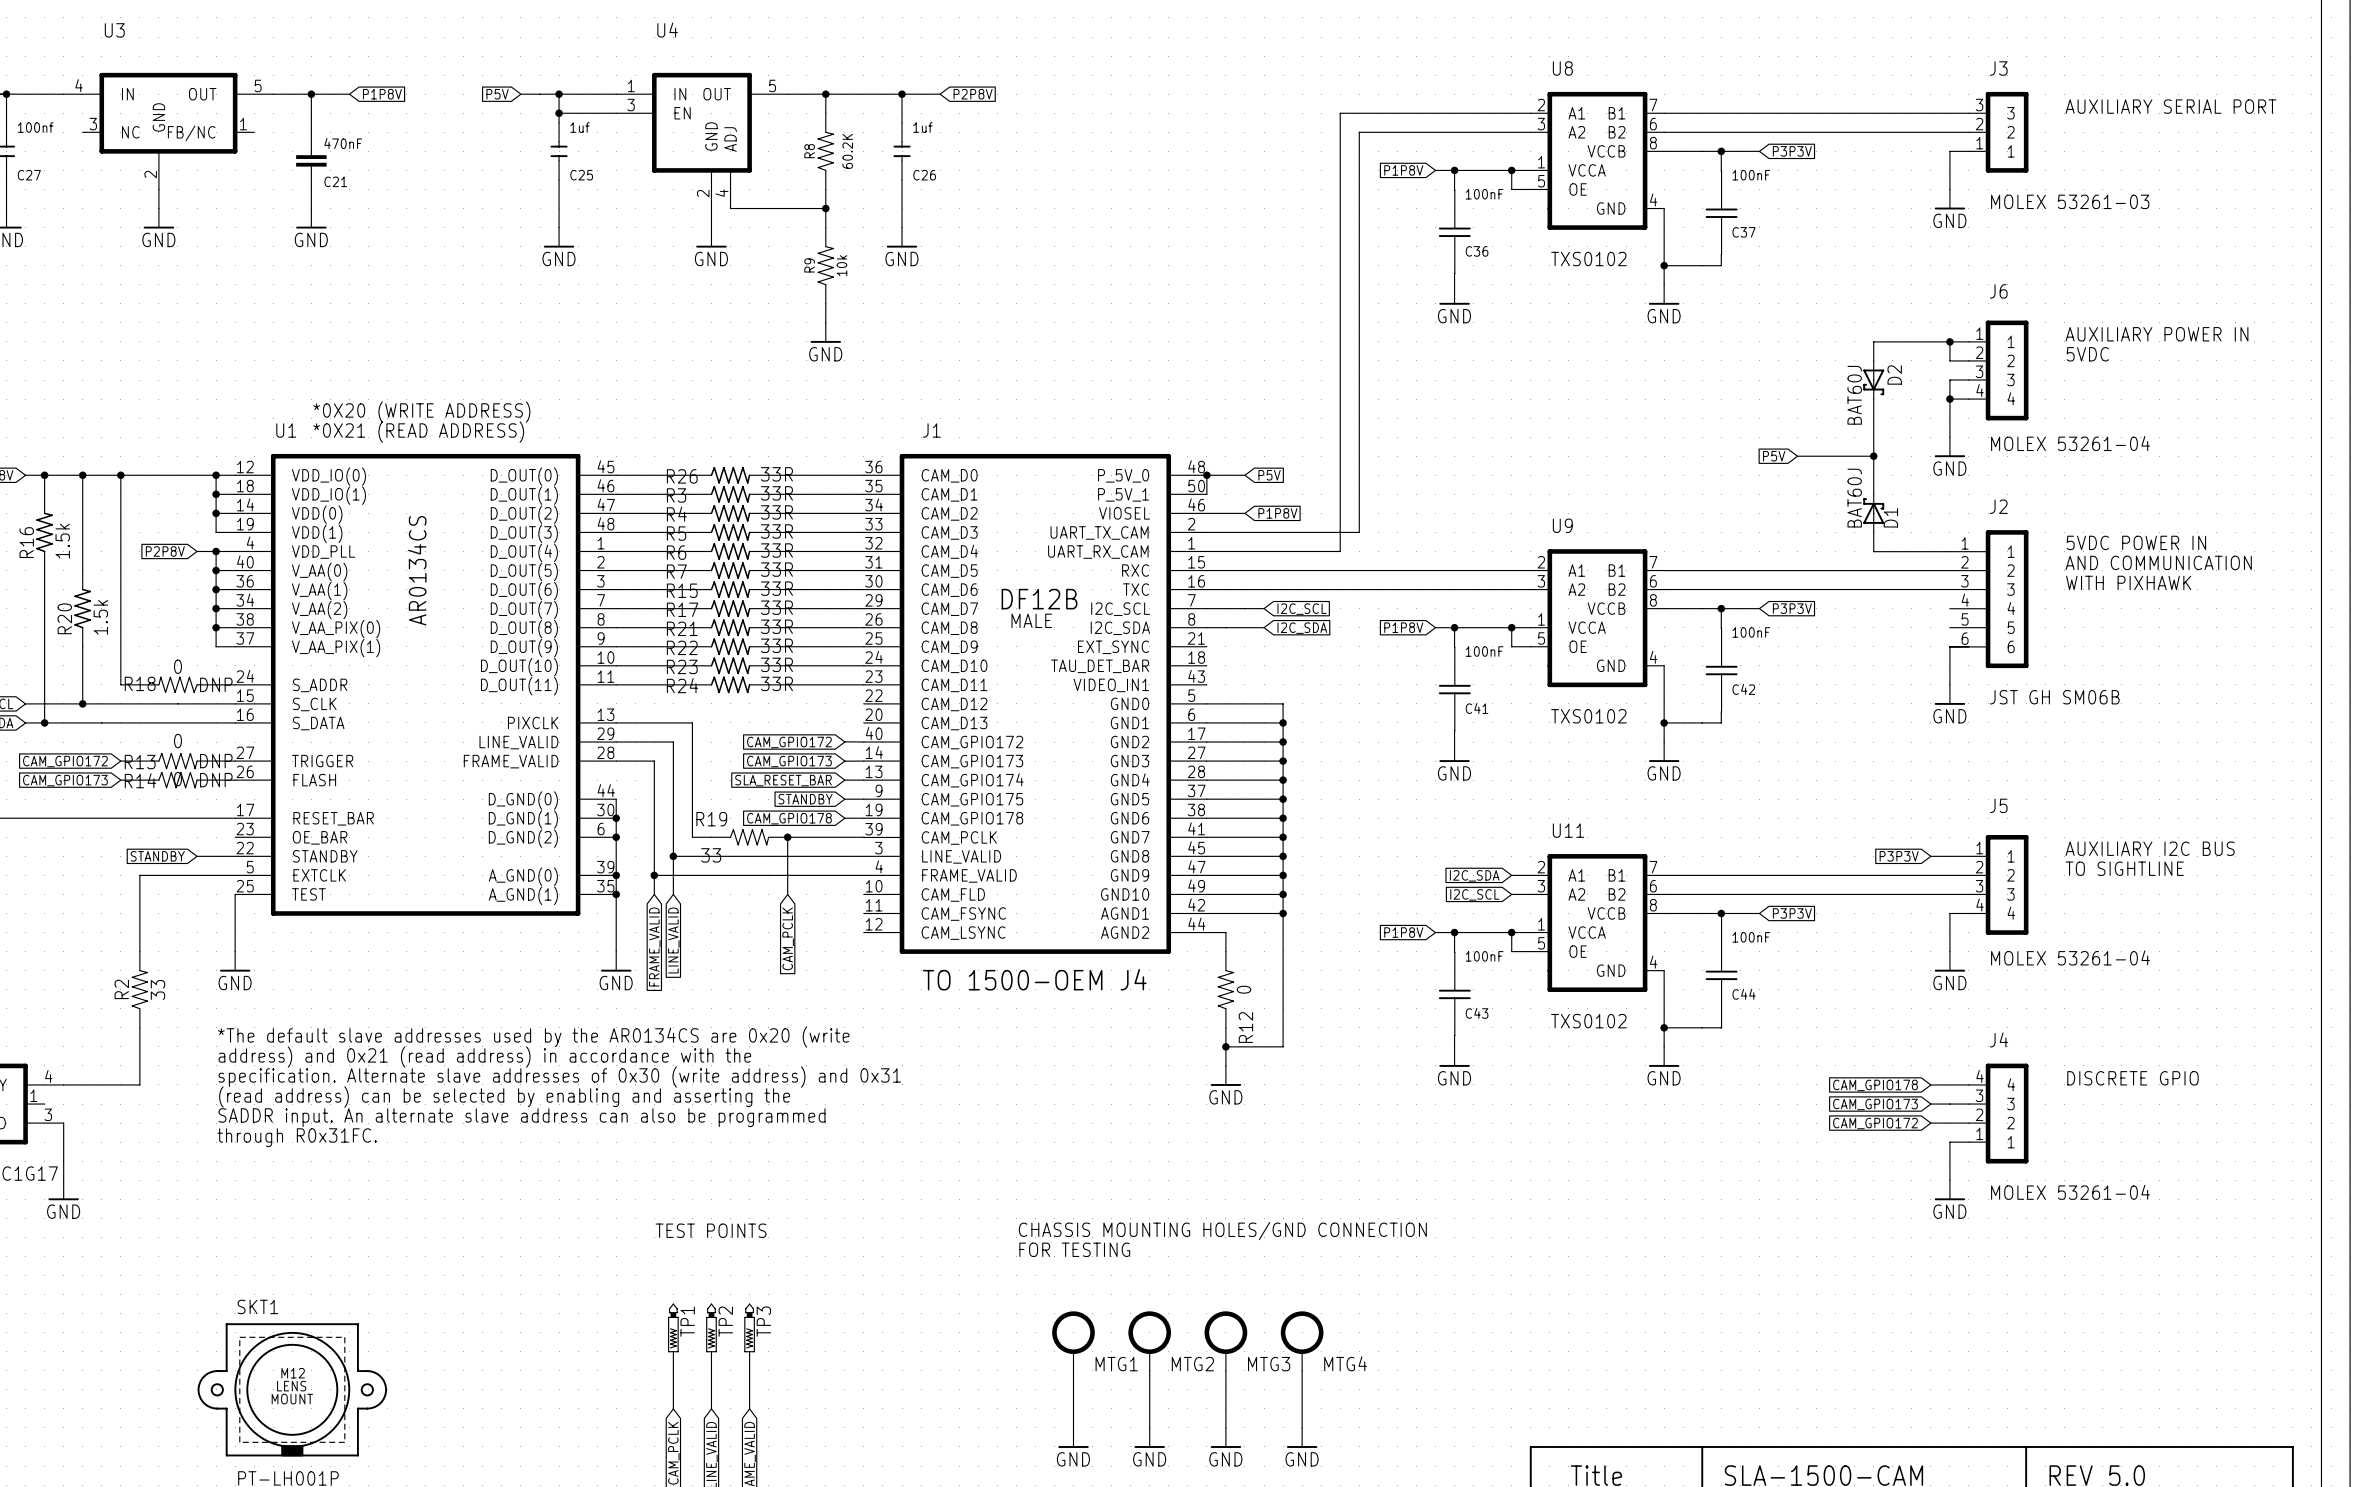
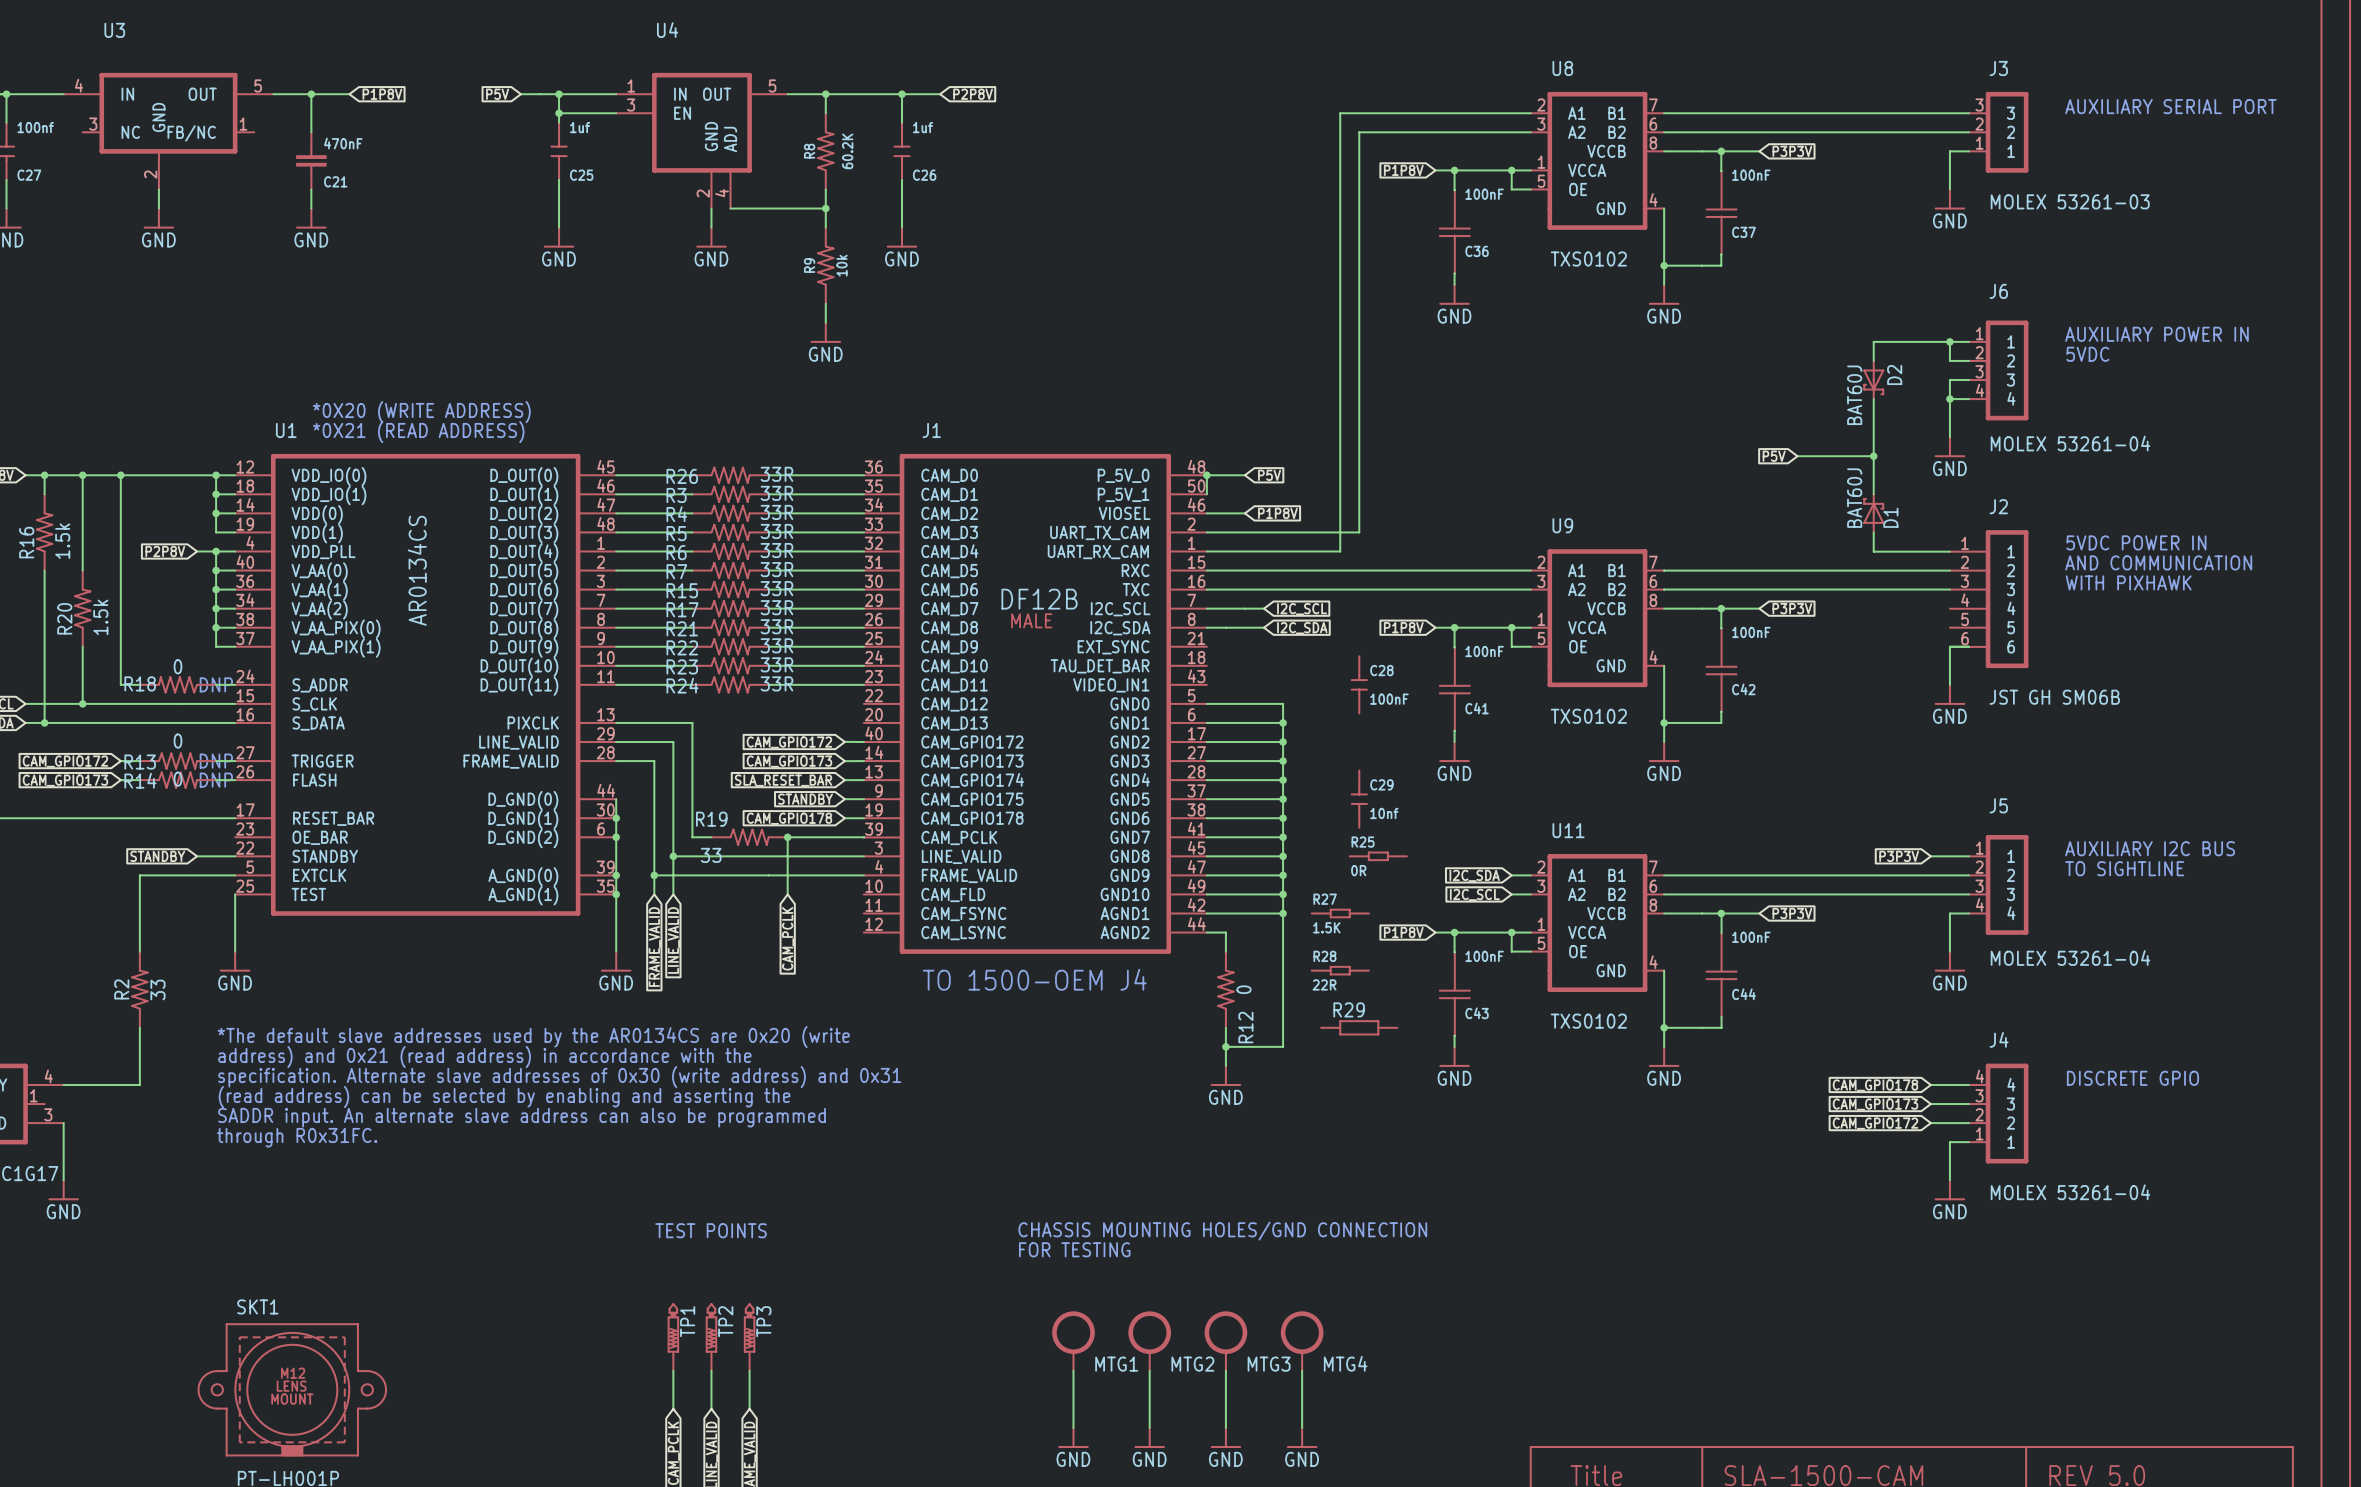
C28: none -> 100nF (1359, 684)
C29: none -> 10nf (1359, 799)
R25: none -> 0R (1378, 856)
R27: none -> 1.5K (1340, 913)
R28: none -> 22R (1340, 970)
R29: none -> (1359, 1027)

